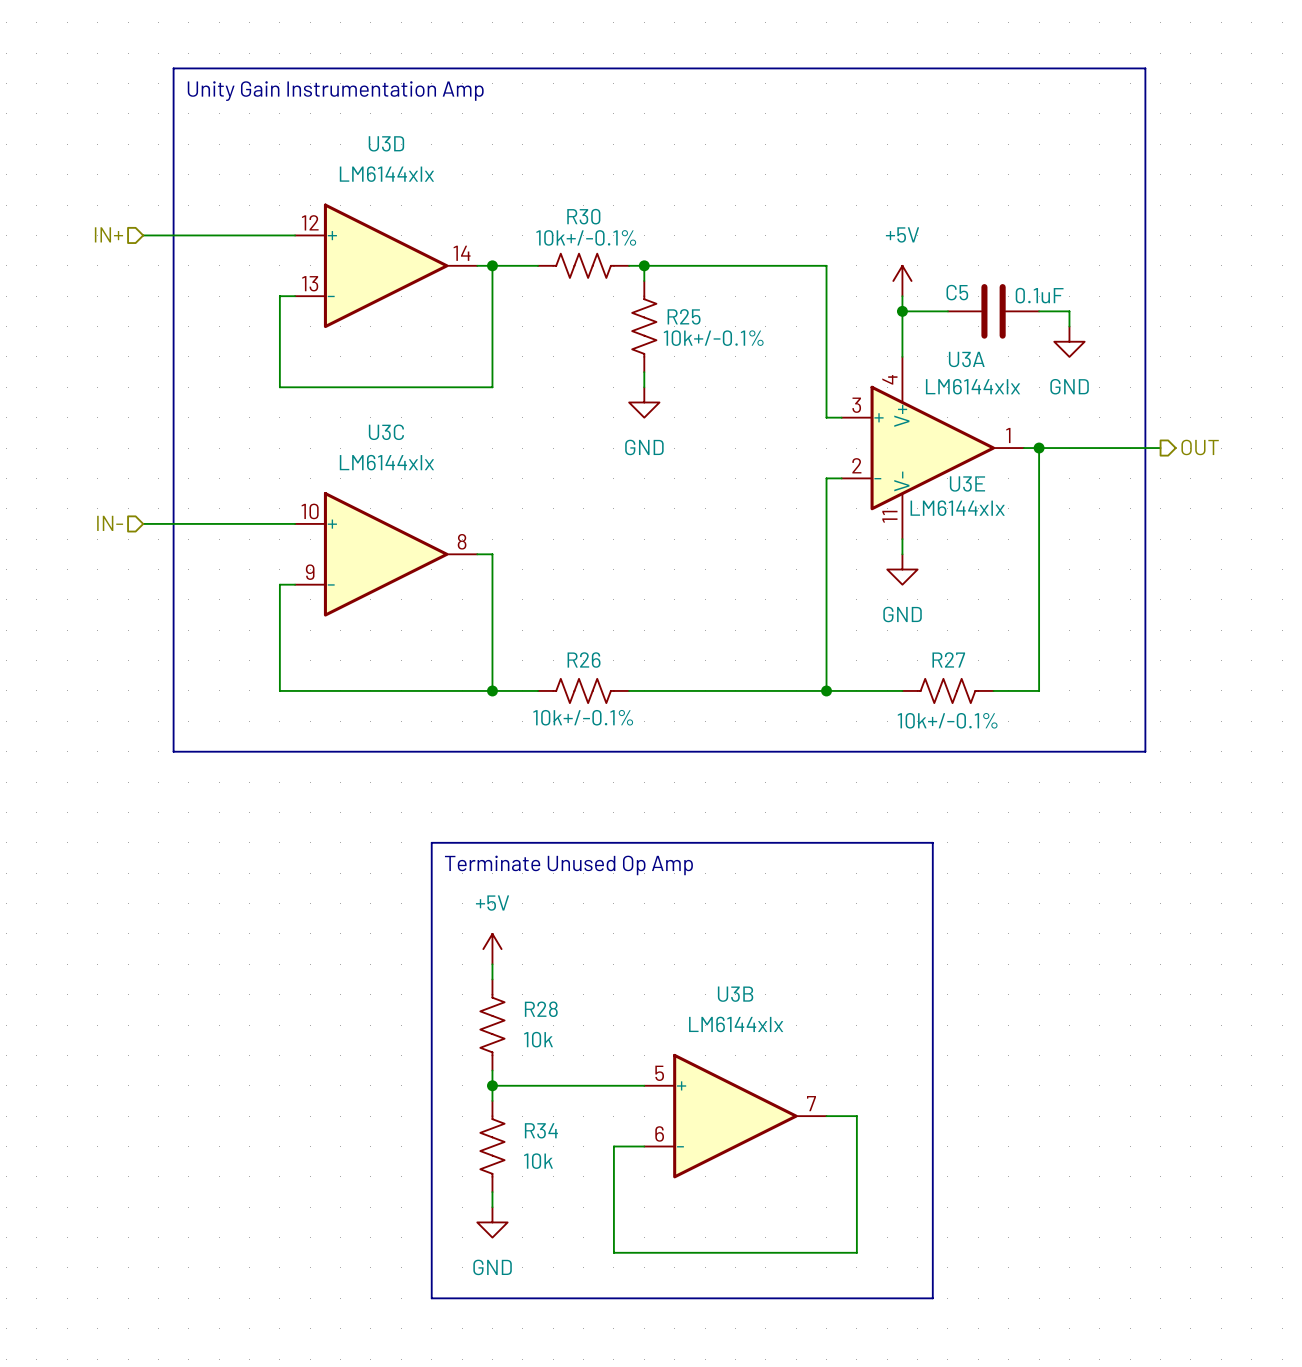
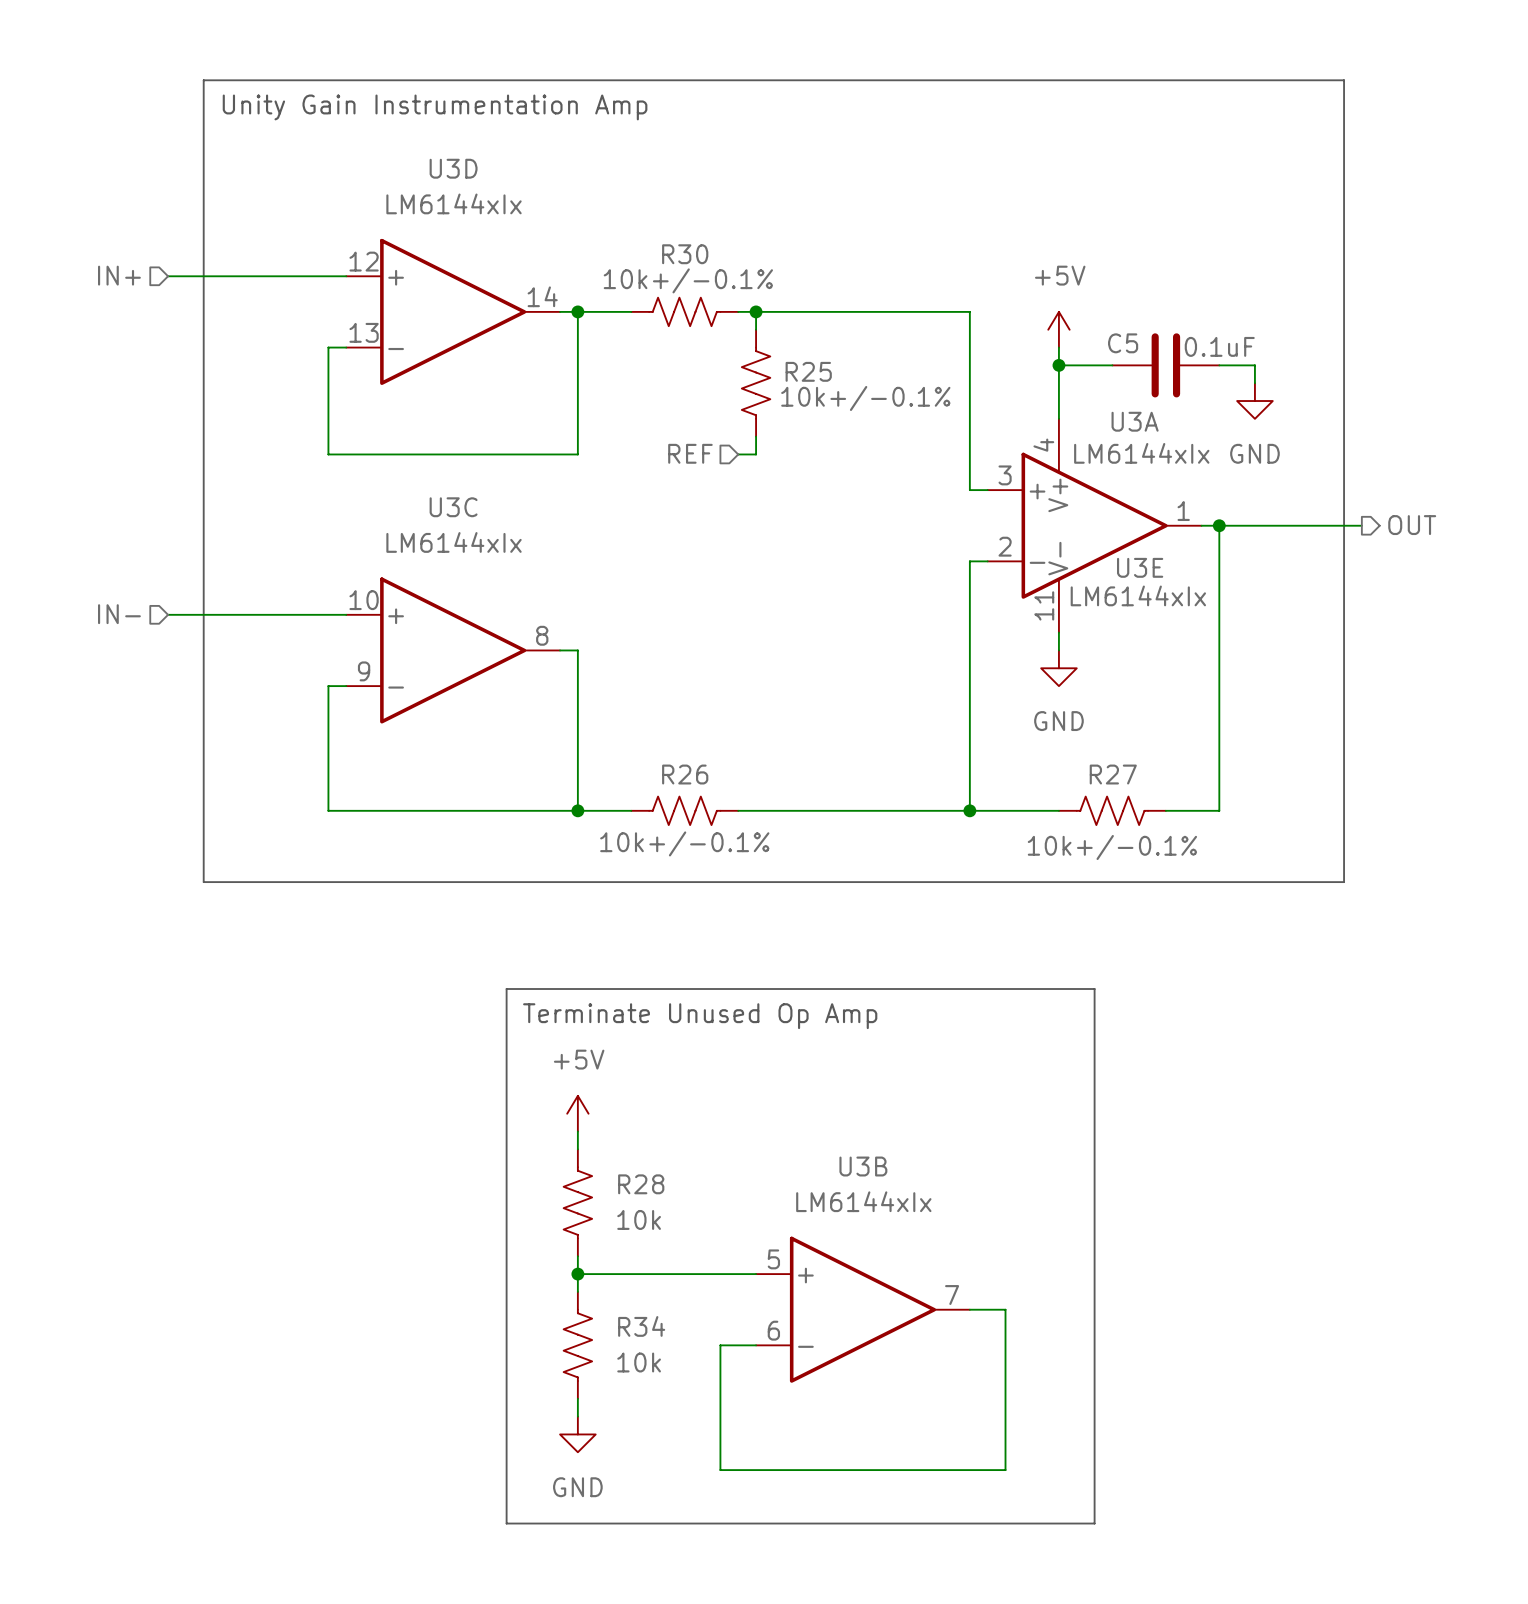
hierarchical label: none -> REF (690, 453)
wire: none -> (738, 454) (756, 454)
power symbol: GND (644, 402) -> none

